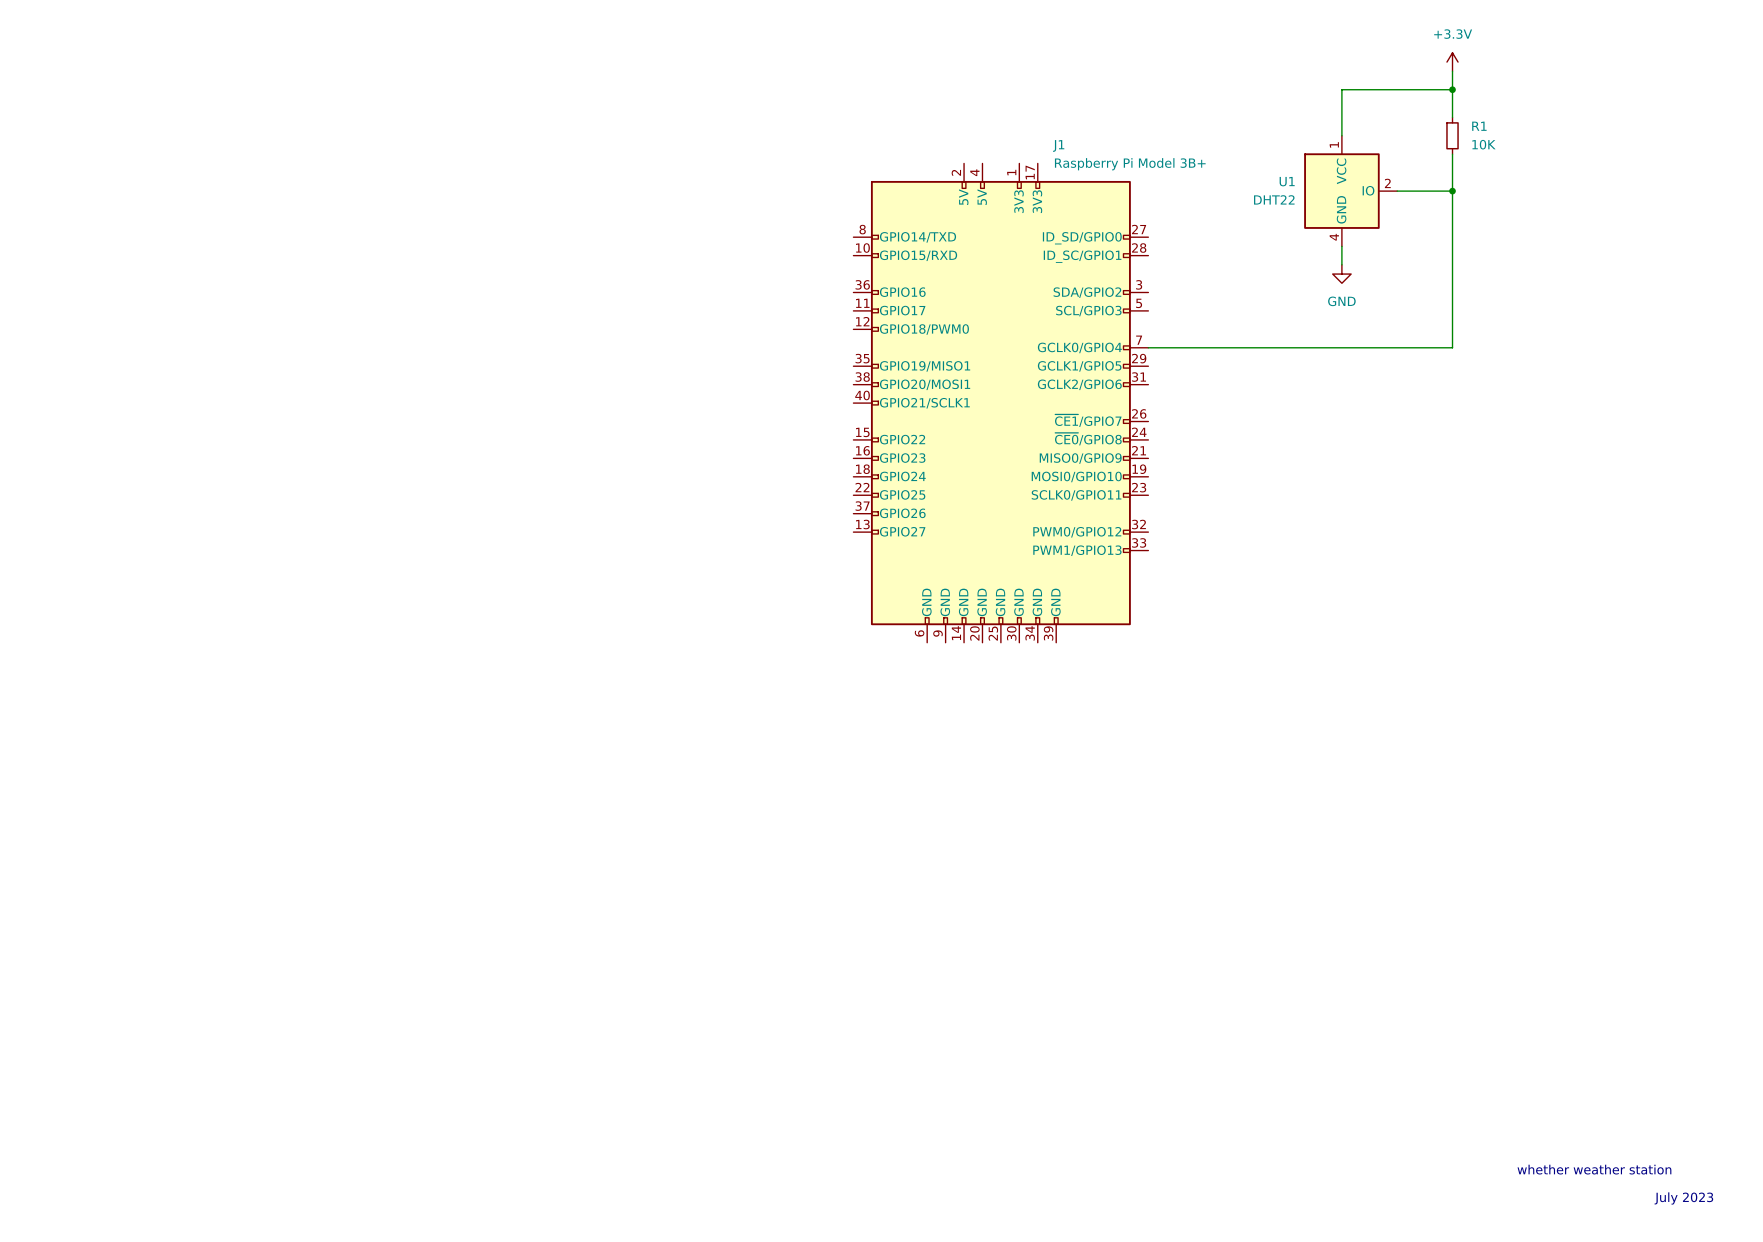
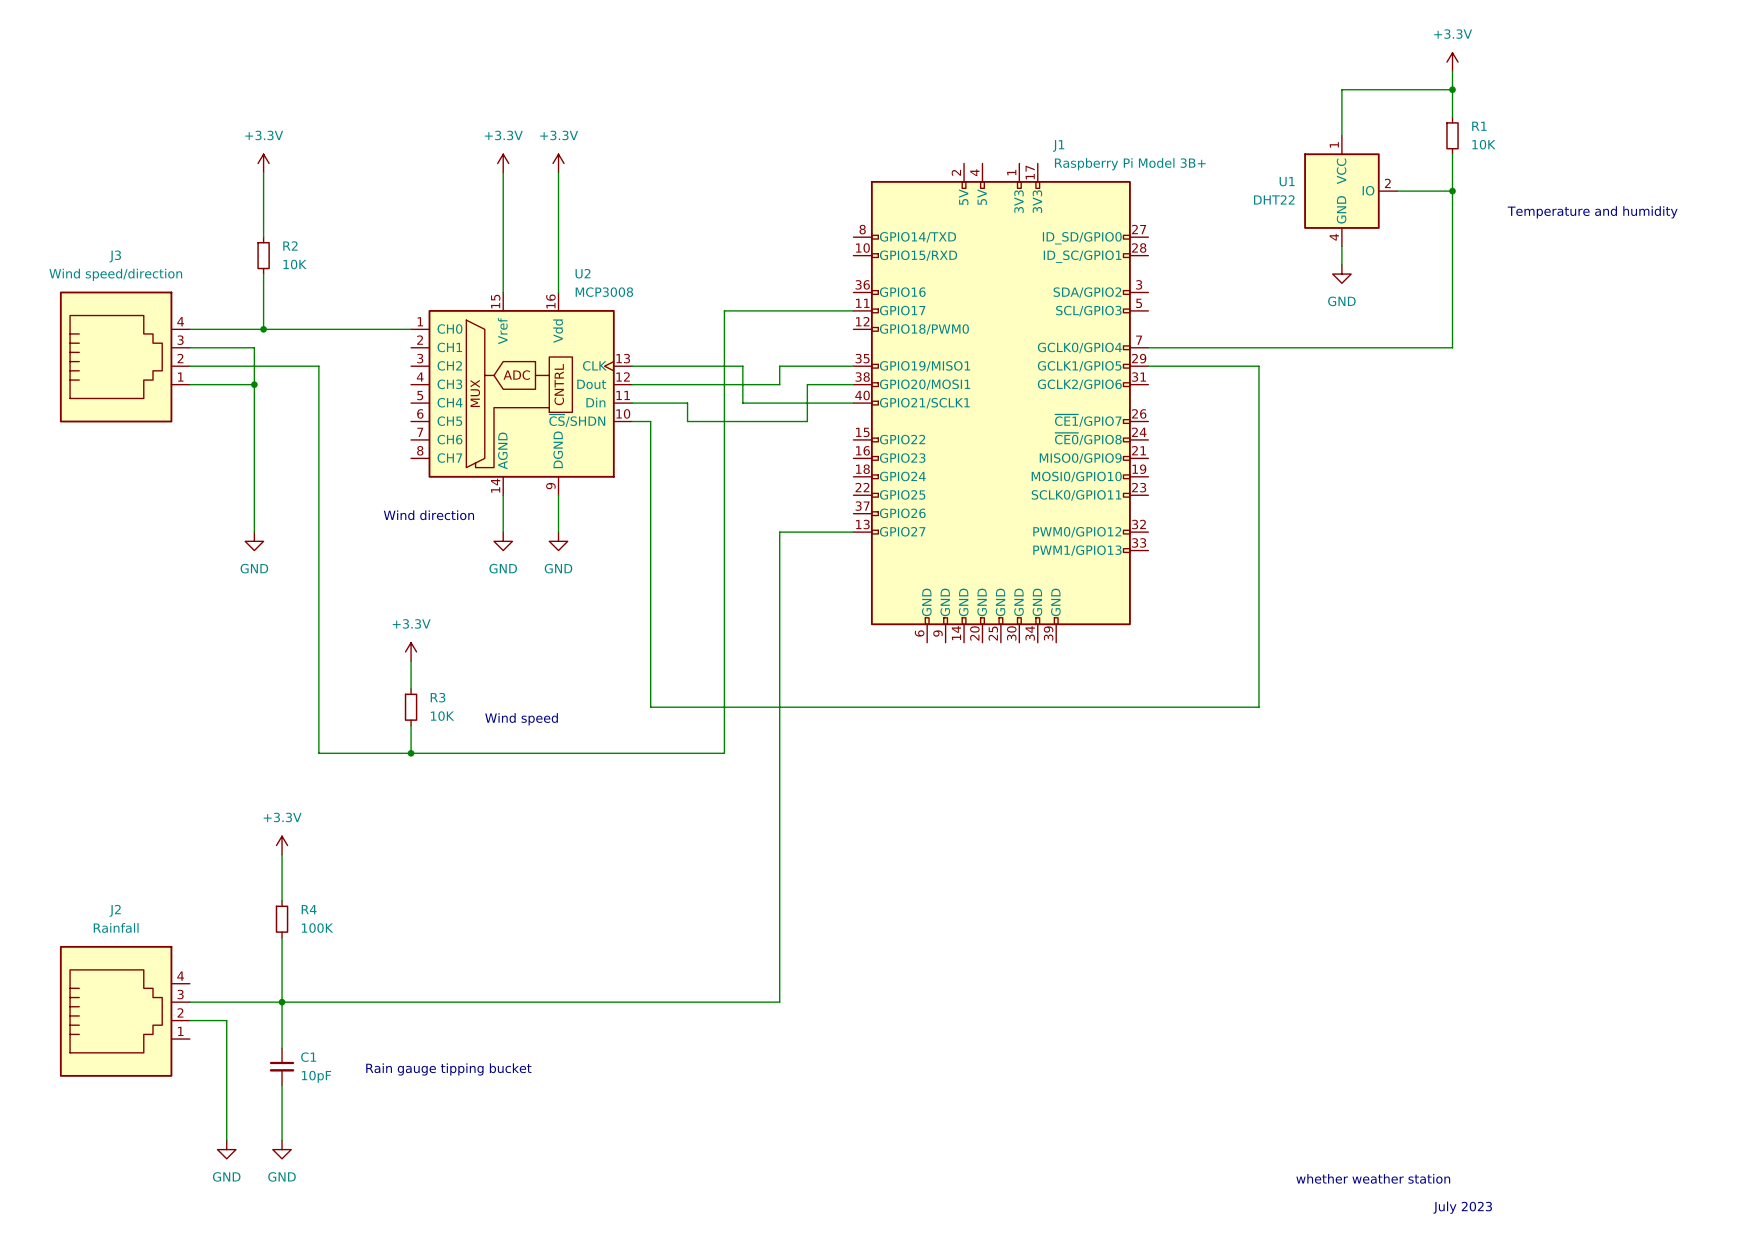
power symbol: none -> +3.3V (263, 163)
power symbol: none -> +3.3V (503, 163)
power symbol: none -> +3.3V (558, 163)
wire: none -> (263, 172) (263, 237)
wire: none -> (503, 172) (503, 292)
wire: none -> (558, 172) (558, 292)
text: none -> Temperature and humidity (1592, 212)
R2: none -> 10K (263, 255)
wire: none -> (263, 274) (263, 329)
wire: none -> (853, 310) (724, 310) (724, 753) (318, 753) (318, 366) (189, 366)
wire: none -> (189, 329) (411, 329)
junction: none -> (263, 329)
wire: none -> (189, 347) (254, 347) (254, 532)
J3: none -> Wind speed/direction (124, 357)
wire: none -> (632, 366) (742, 366) (742, 403) (853, 403)
wire: none -> (853, 366) (779, 366) (779, 384) (632, 384)
wire: none -> (1148, 366) (1258, 366) (1258, 707) (650, 707) (650, 421) (632, 421)
wire: none -> (189, 384) (254, 384)
junction: none -> (254, 384)
wire: none -> (853, 384) (807, 384) (807, 421) (687, 421) (687, 403) (632, 403)
U2: none -> MCP3008 (521, 393)
wire: none -> (503, 495) (503, 532)
wire: none -> (558, 495) (558, 532)
text: none -> Wind direction (428, 515)
wire: none -> (853, 532) (779, 532) (779, 1002) (189, 1002)
power symbol: none -> GND (254, 541)
power symbol: none -> GND (503, 541)
power symbol: none -> GND (558, 541)
power symbol: none -> +3.3V (411, 651)
wire: none -> (411, 661) (411, 688)
R3: none -> 10K (411, 707)
text: none -> Wind speed (521, 719)
wire: none -> (411, 725) (411, 753)
junction: none -> (411, 753)
power symbol: none -> +3.3V (282, 845)
wire: none -> (282, 854) (282, 900)
R4: none -> 100K (282, 919)
wire: none -> (282, 937) (282, 1048)
junction: none -> (282, 1002)
J2: none -> Rainfall (124, 1011)
wire: none -> (189, 1020) (226, 1020) (226, 1140)
C1: none -> 10pF (282, 1066)
text: none -> Rain gauge tipping bucket (448, 1069)
wire: none -> (282, 1085) (282, 1140)
power symbol: none -> GND (226, 1149)
power symbol: none -> GND (282, 1149)
text: whether weather station (1594, 1169) -> none
text: none -> whether weather station (1373, 1178)
text: July 2023 (1683, 1198) -> none
text: none -> July 2023 (1462, 1207)

